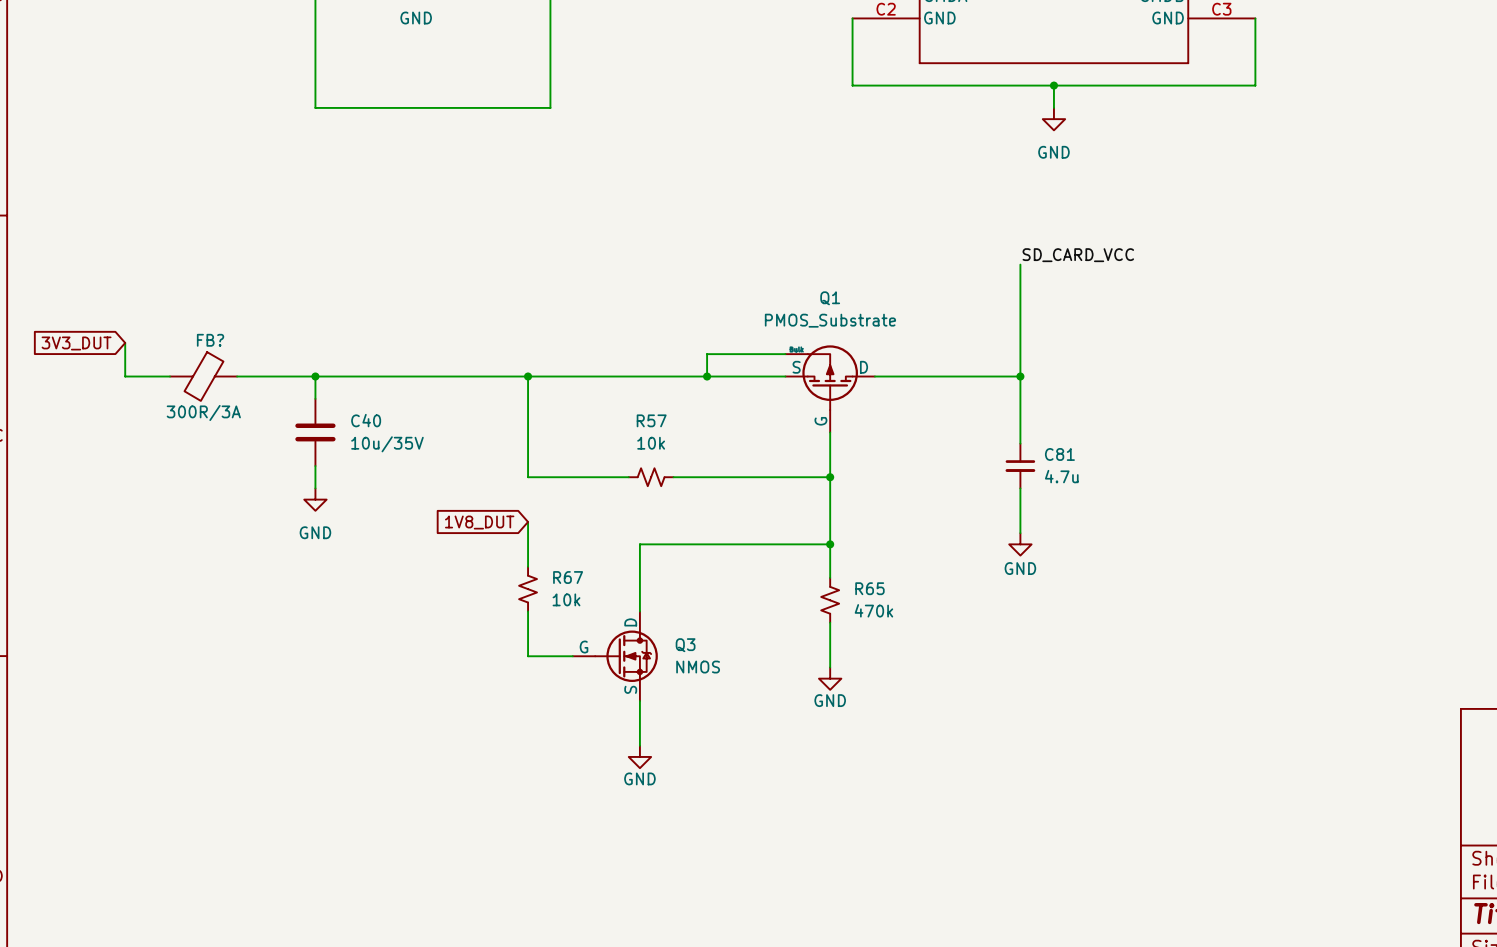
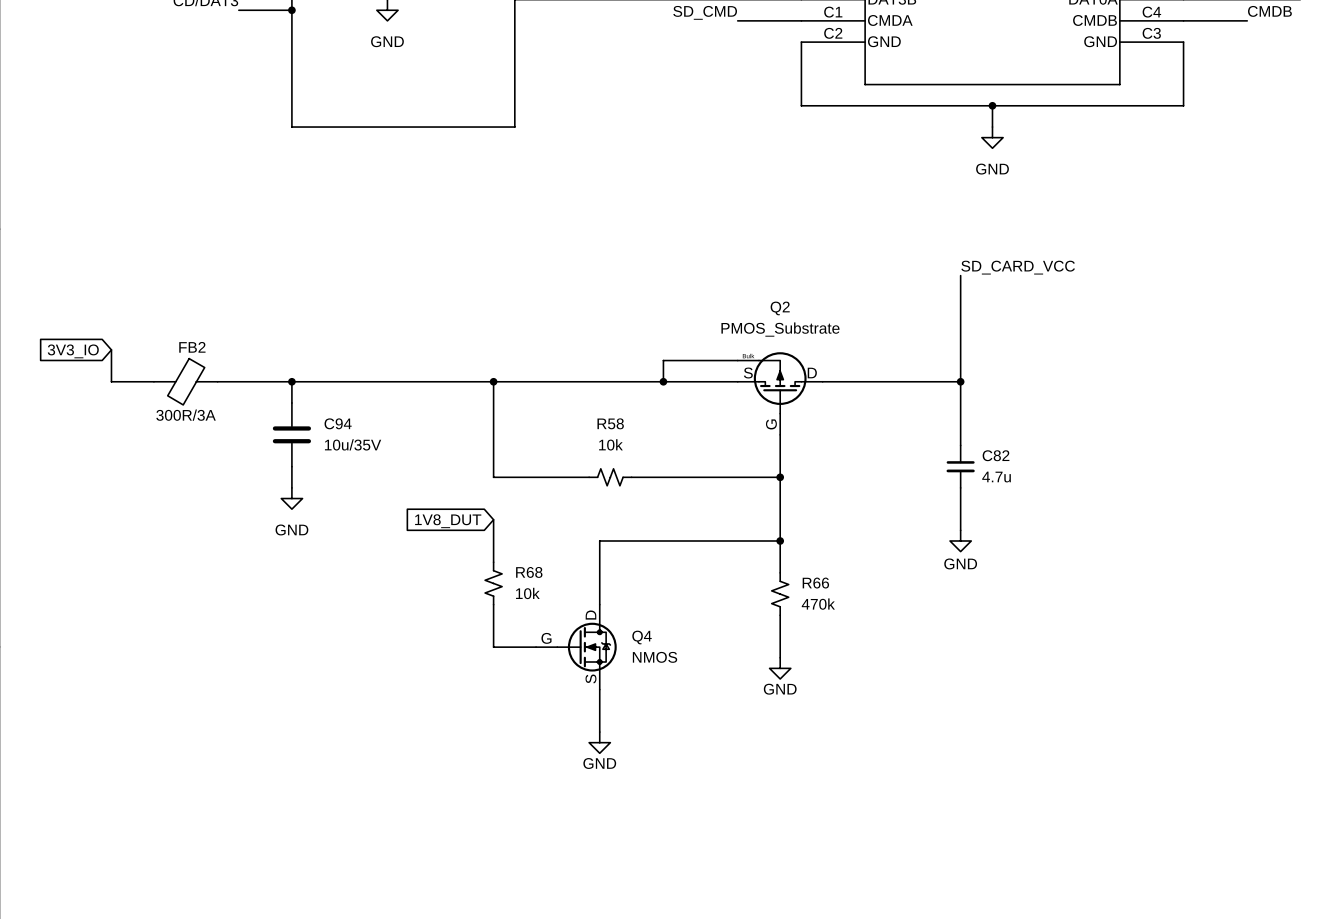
Q1 name: Q1 (830, 298) -> Q2 (780, 308)
FB? name: FB? (210, 340) -> FB2 (192, 347)
global label: 3V3_DUT (76, 343) -> 3V3_IO (73, 351)
C40 name: C40 (366, 420) -> C94 (338, 423)
R57 name: R57 (651, 420) -> R58 (610, 423)
C81 name: C81 (1059, 454) -> C82 (996, 455)
R67 name: R67 (568, 577) -> R68 (529, 572)
R65 name: R65 (869, 588) -> R66 (815, 583)
Q3 name: Q3 (685, 645) -> Q4 (642, 637)

